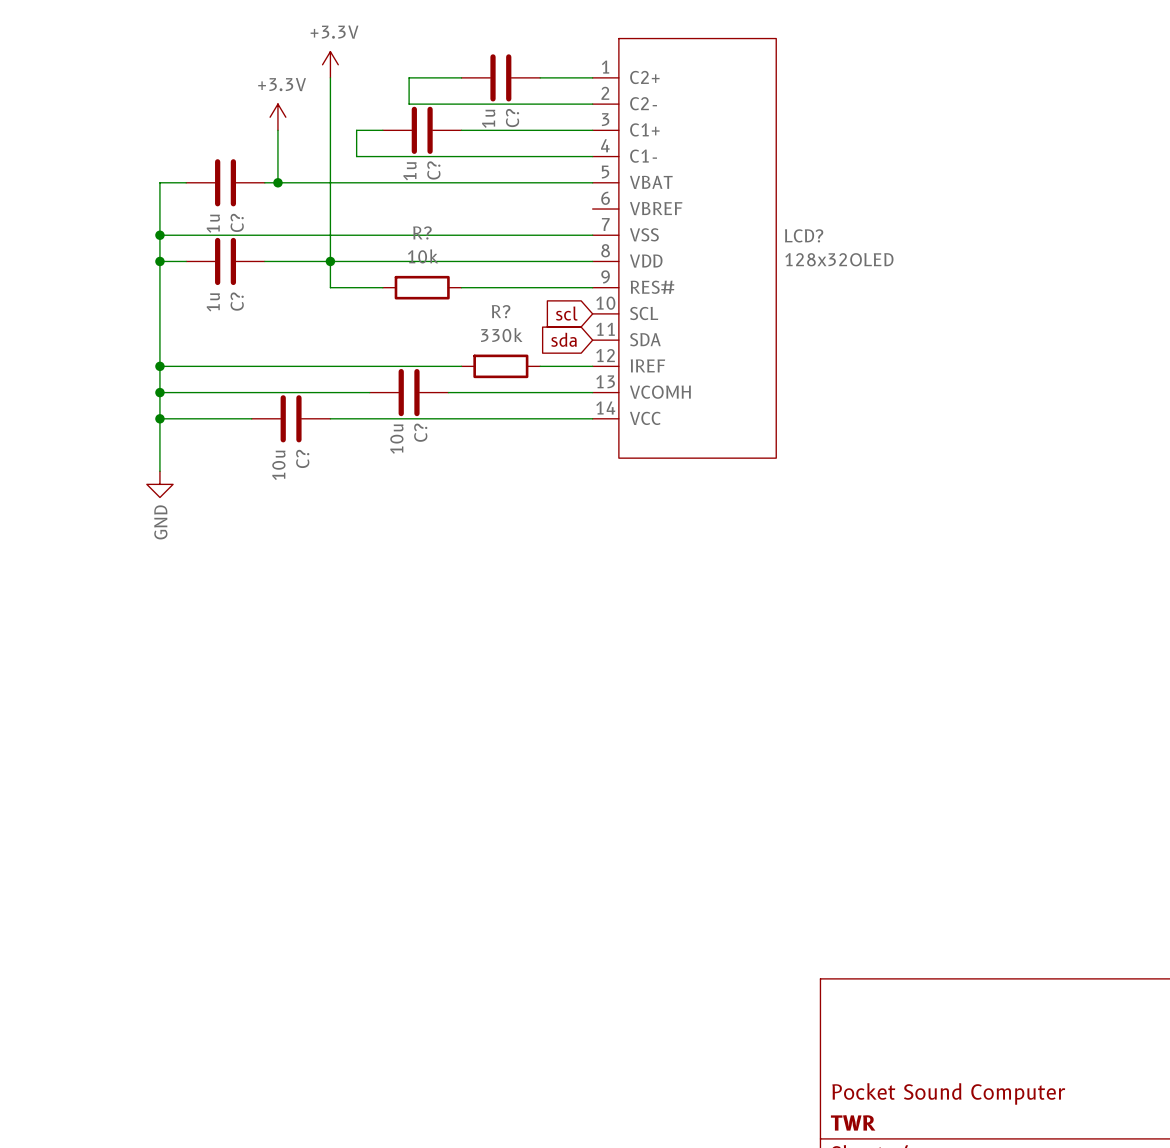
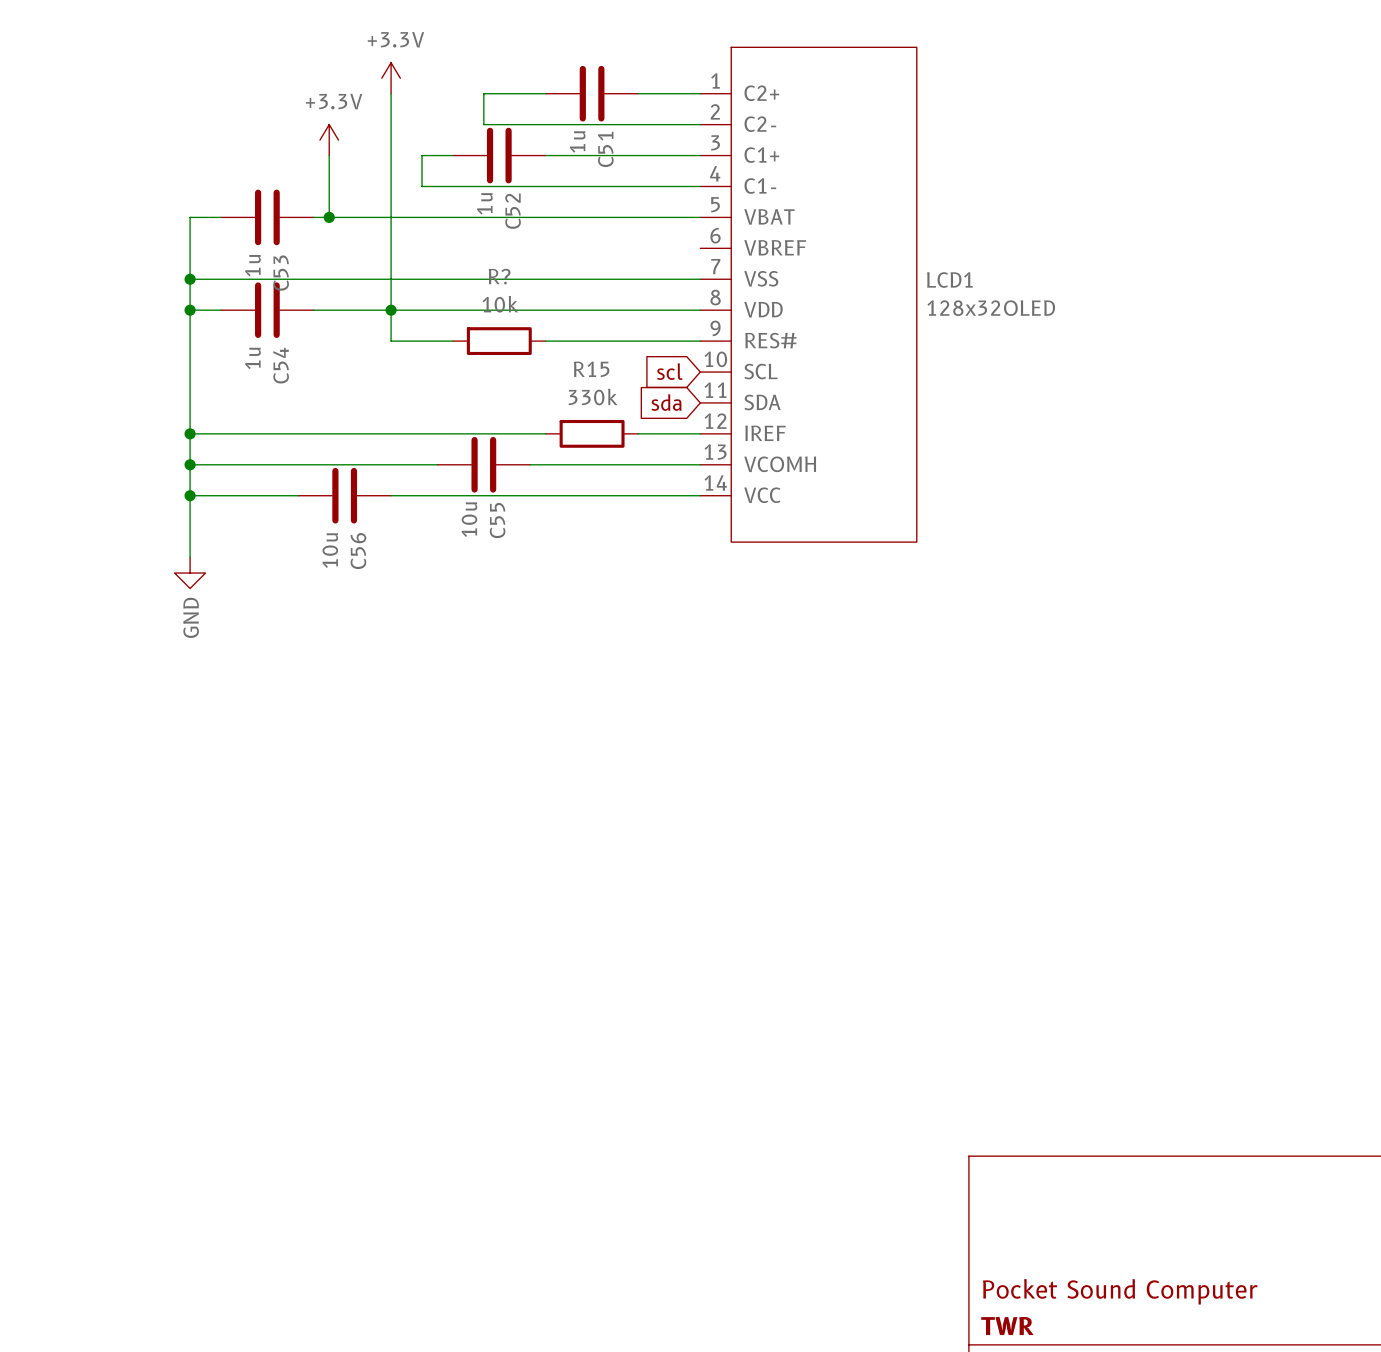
C? name: C? (512, 118) -> C51 (605, 149)
C? name: C? (433, 170) -> C52 (513, 211)
C? name: C? (237, 222) -> C53 (281, 273)
LCD? name: LCD? (804, 235) -> LCD1 (949, 280)
C? name: C? (237, 301) -> C54 (281, 365)
R? name: R? (501, 311) -> R15 (591, 369)
C? name: C? (420, 432) -> C55 (497, 520)
C? name: C? (302, 458) -> C56 (358, 551)

